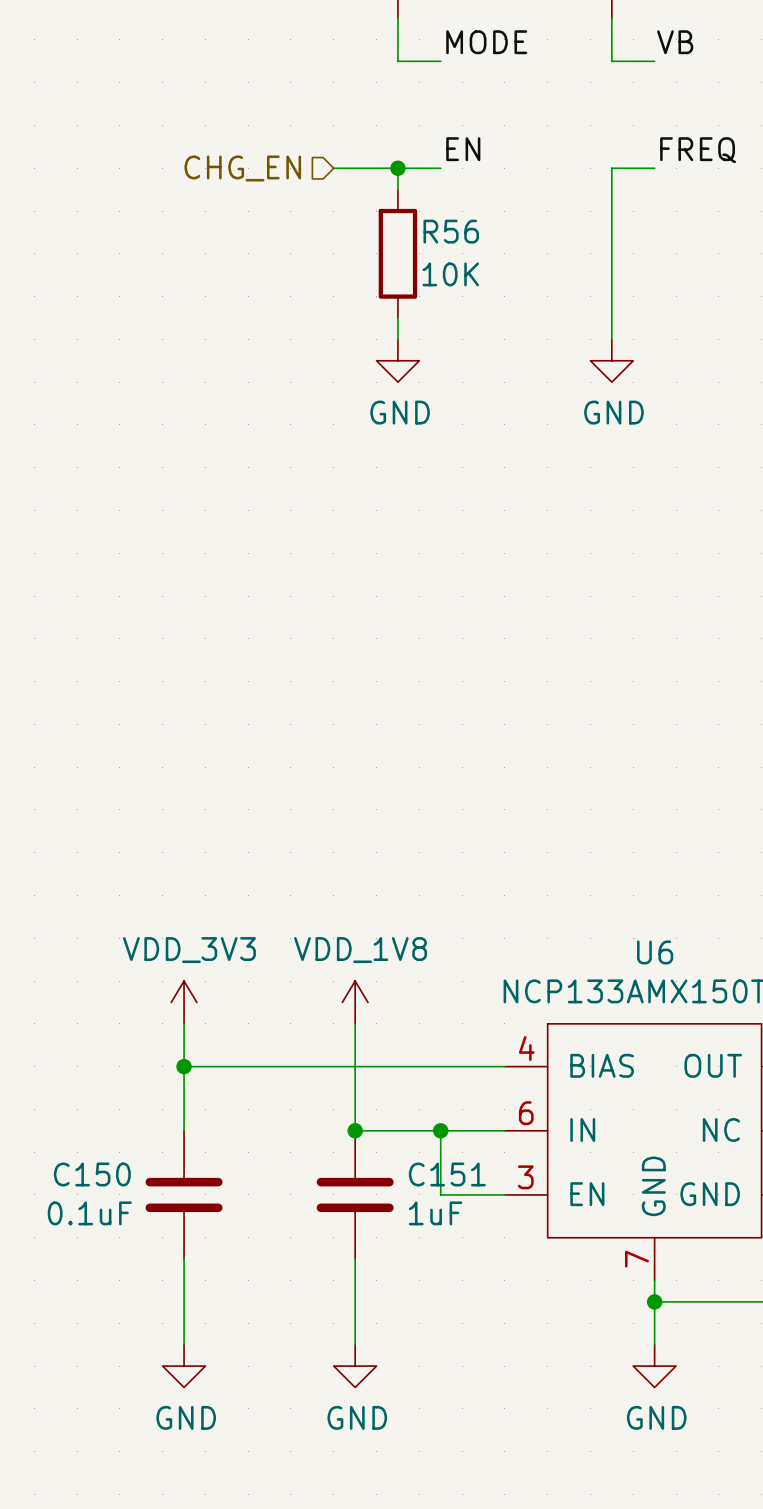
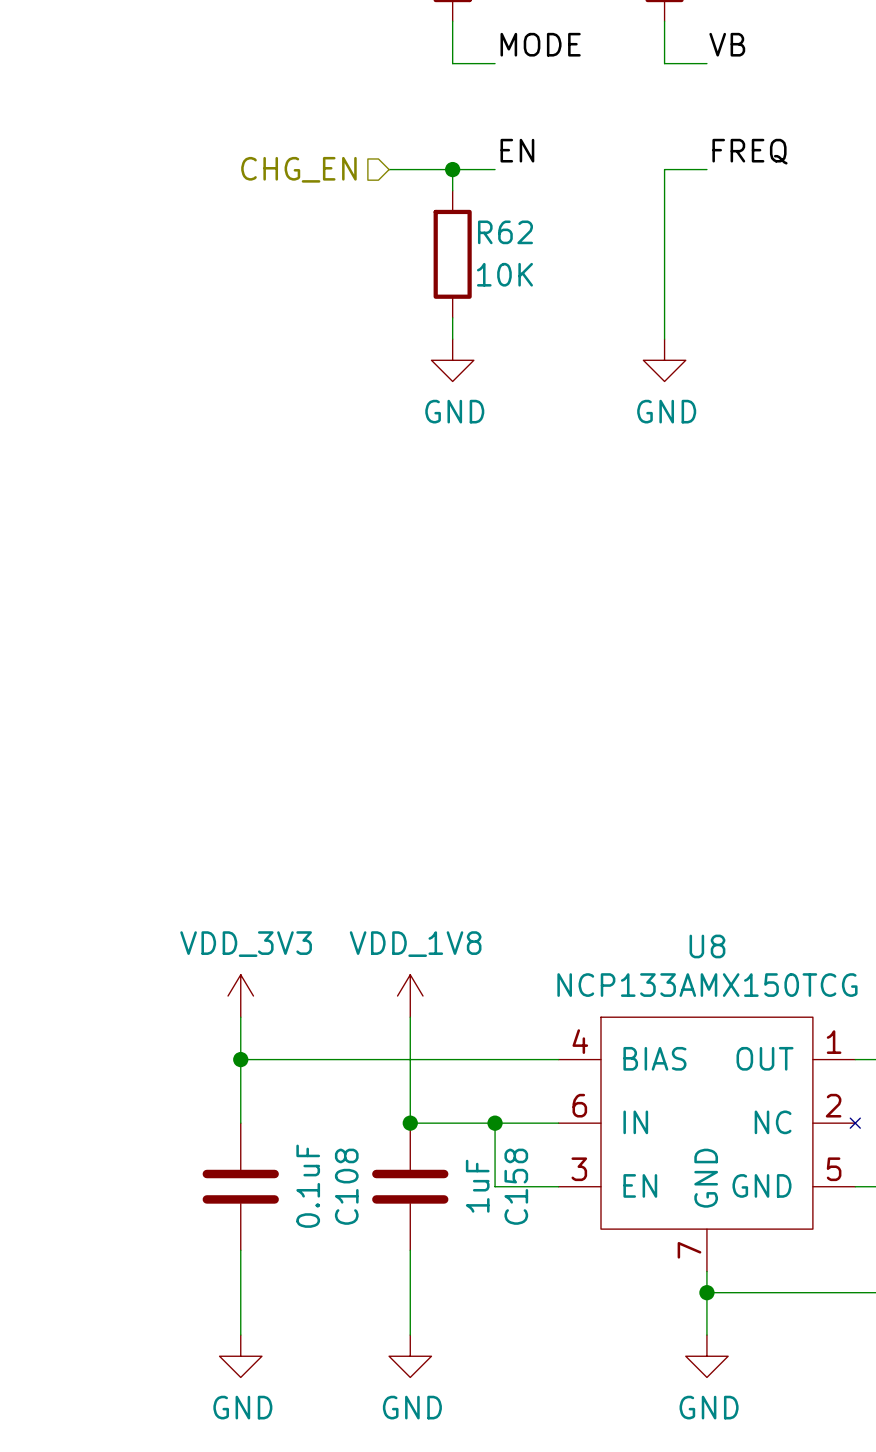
R56 name: R56 (451, 231) -> R62 (505, 232)
U6 name: U6 (655, 952) -> U8 (707, 946)
C150 name: C150 (92, 1174) -> C108 (346, 1186)
C151 name: C151 (447, 1174) -> C158 (516, 1186)
C150 value rotation: 0° (89, 1213) -> 90° counterclockwise (308, 1186)
C150 value position: 0.1uF (89, 1213) -> 0.1uF (308, 1186)
C151 value rotation: 0° (435, 1213) -> 90° counterclockwise (477, 1186)

